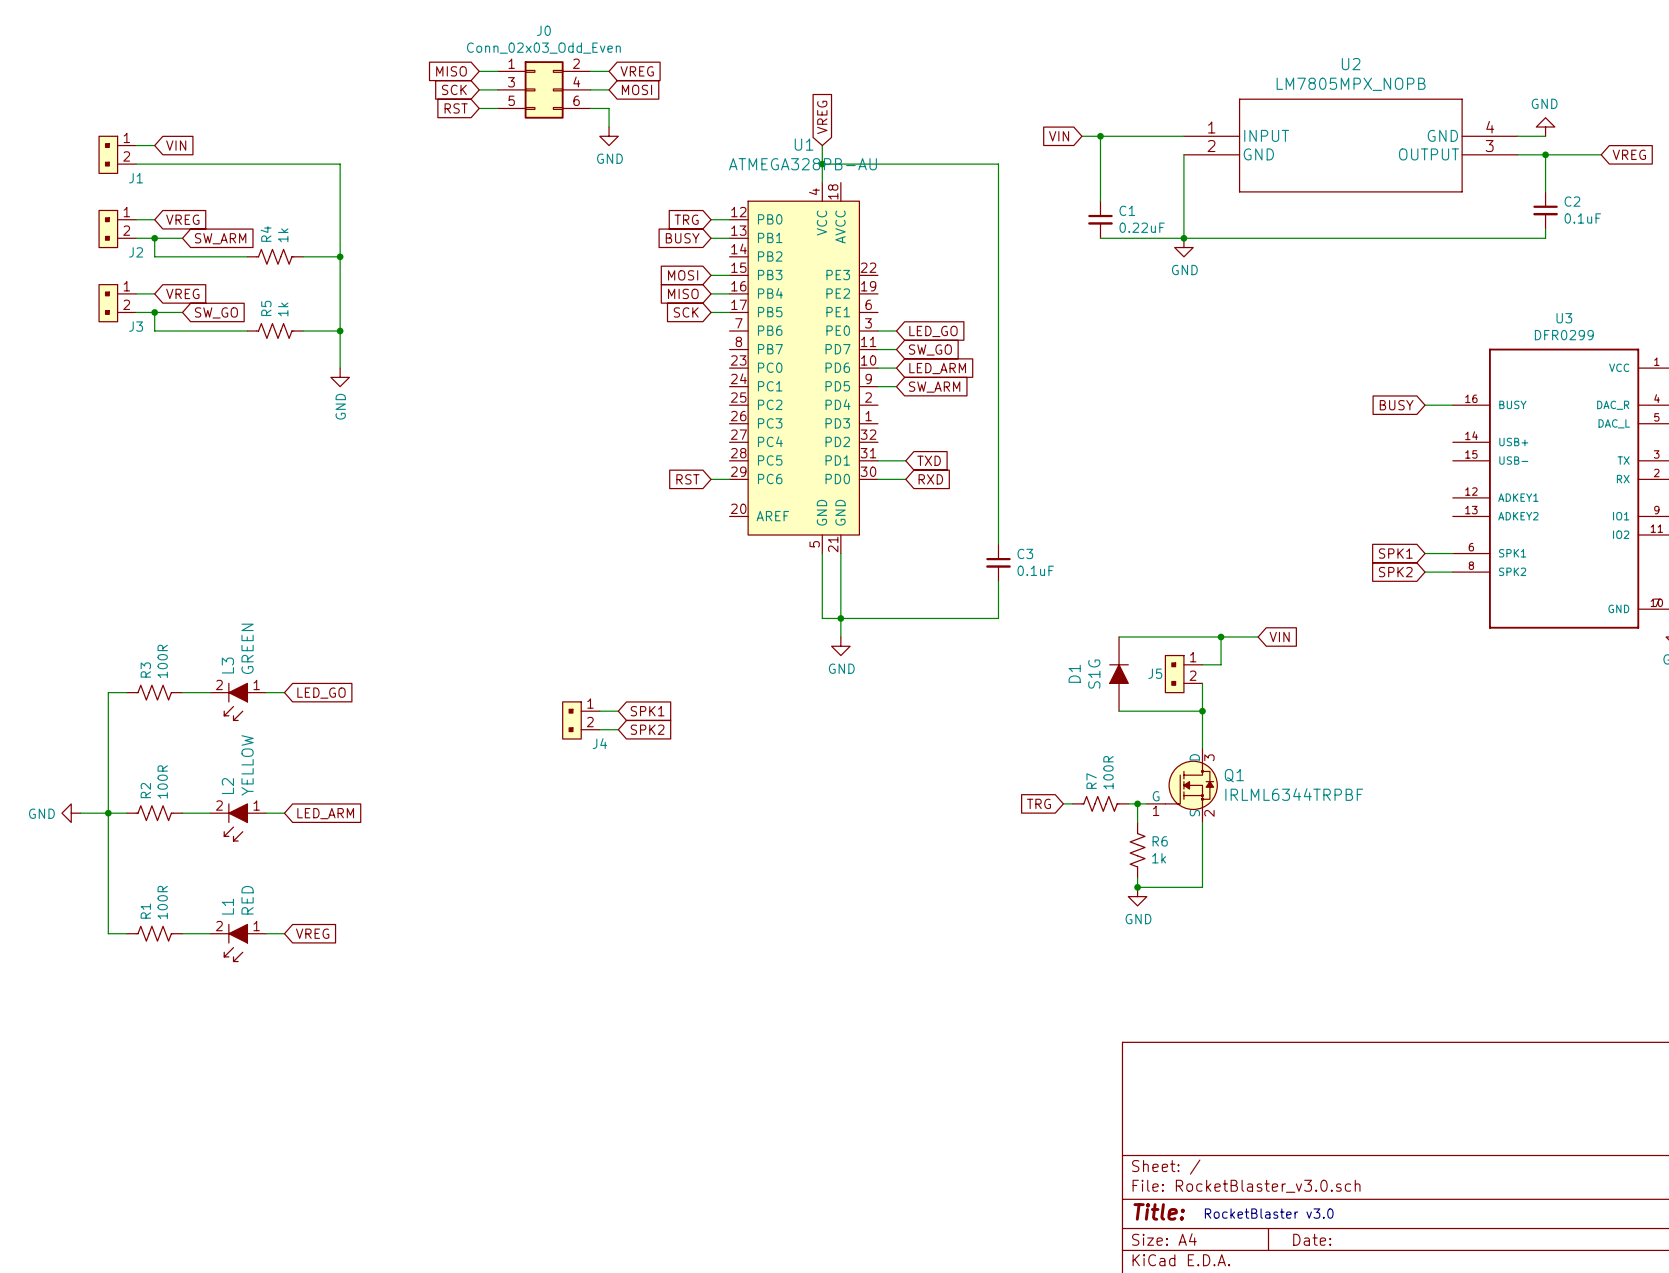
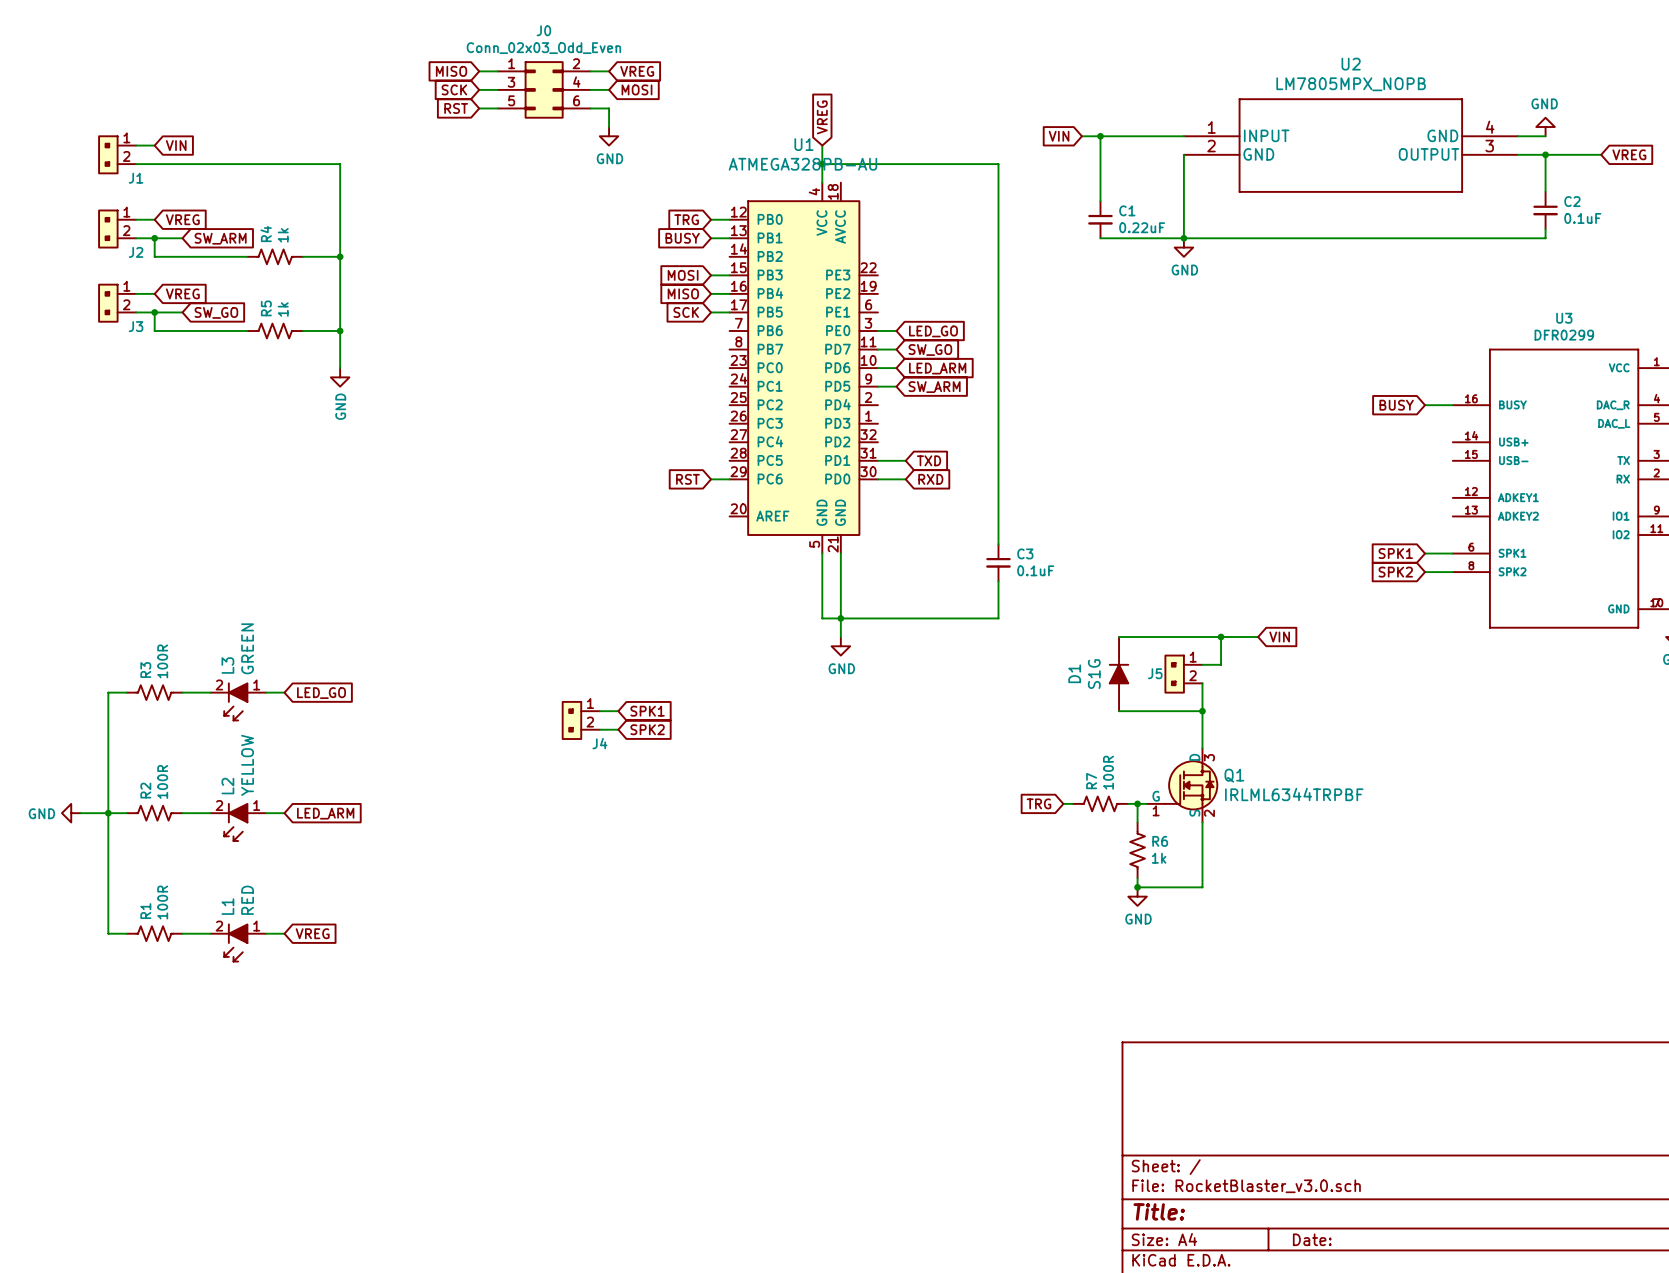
text: RocketBlaster v3.0 (1269, 1213) -> none

